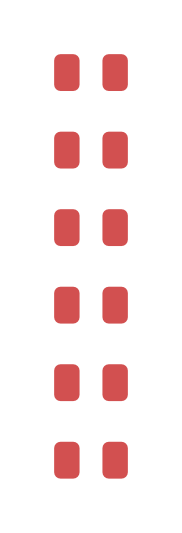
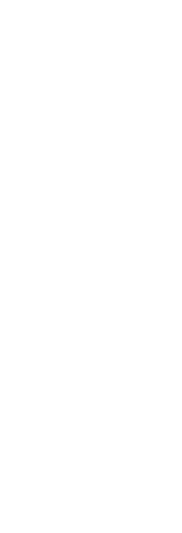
part: (91, 72) -> none
part: (91, 150) -> none
part: (91, 227) -> none
part: (91, 305) -> none
part: (91, 382) -> none
part: (91, 460) -> none

